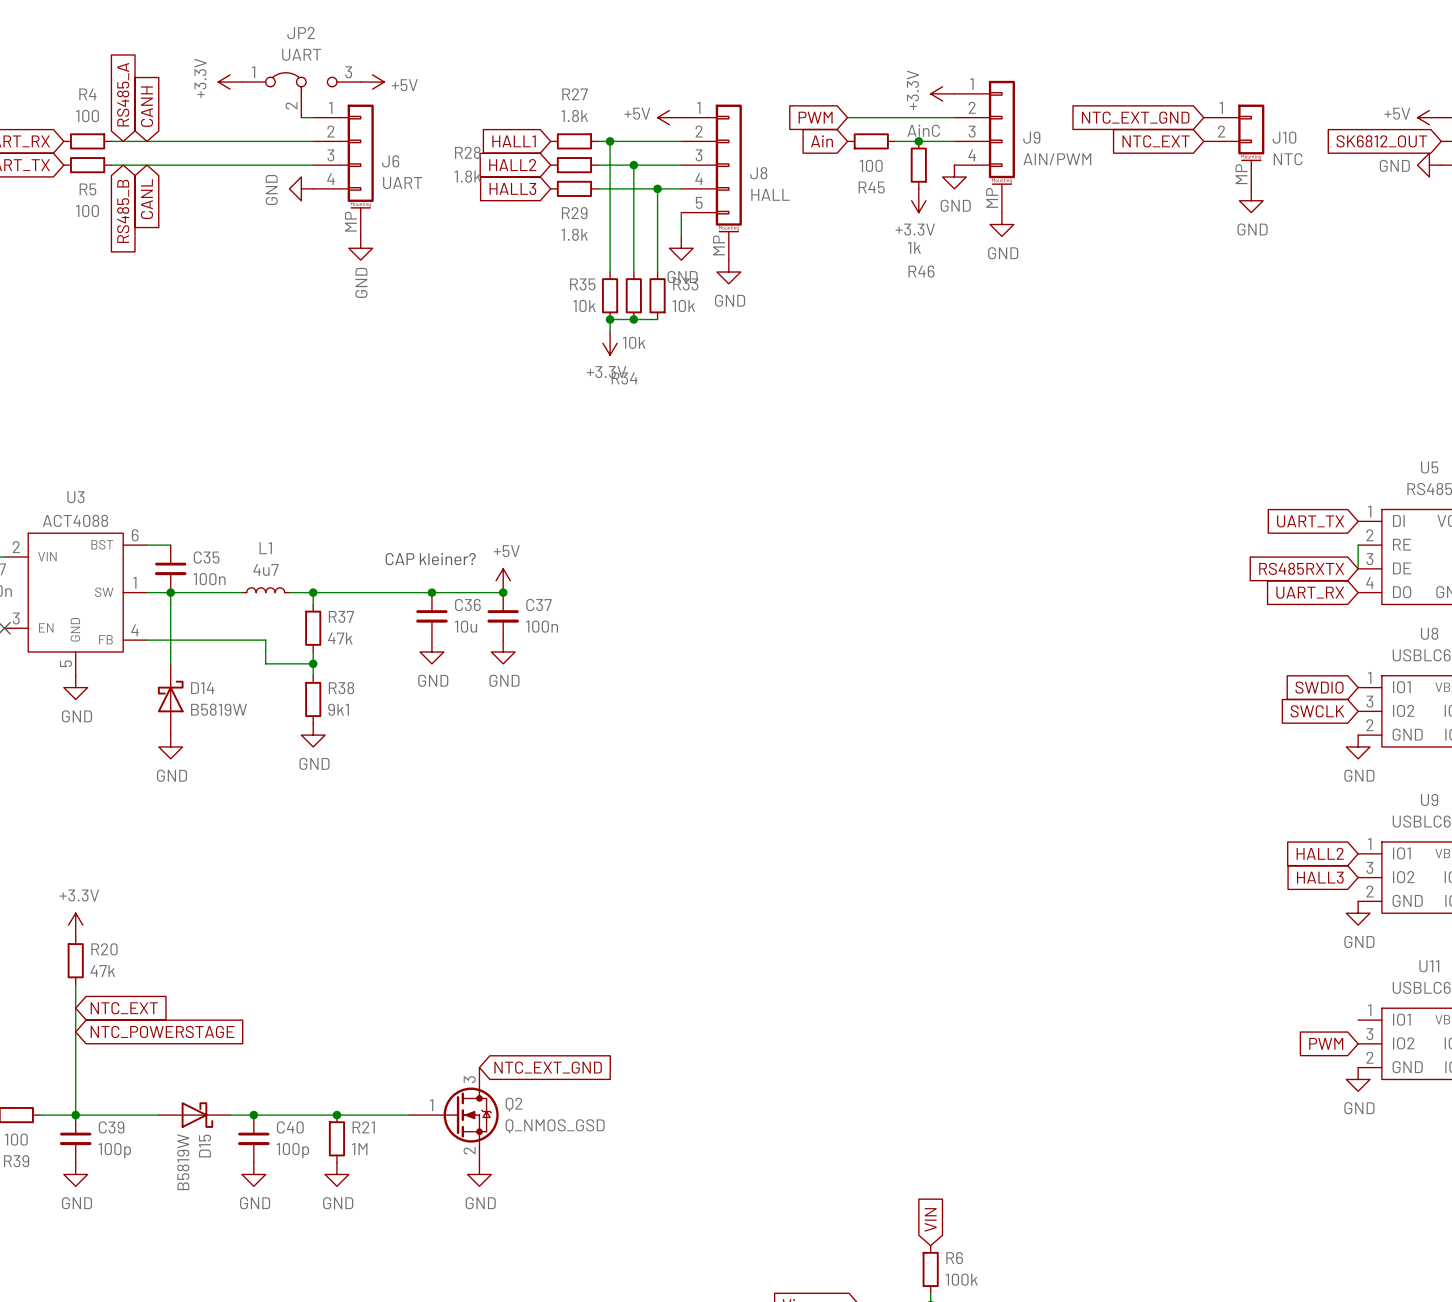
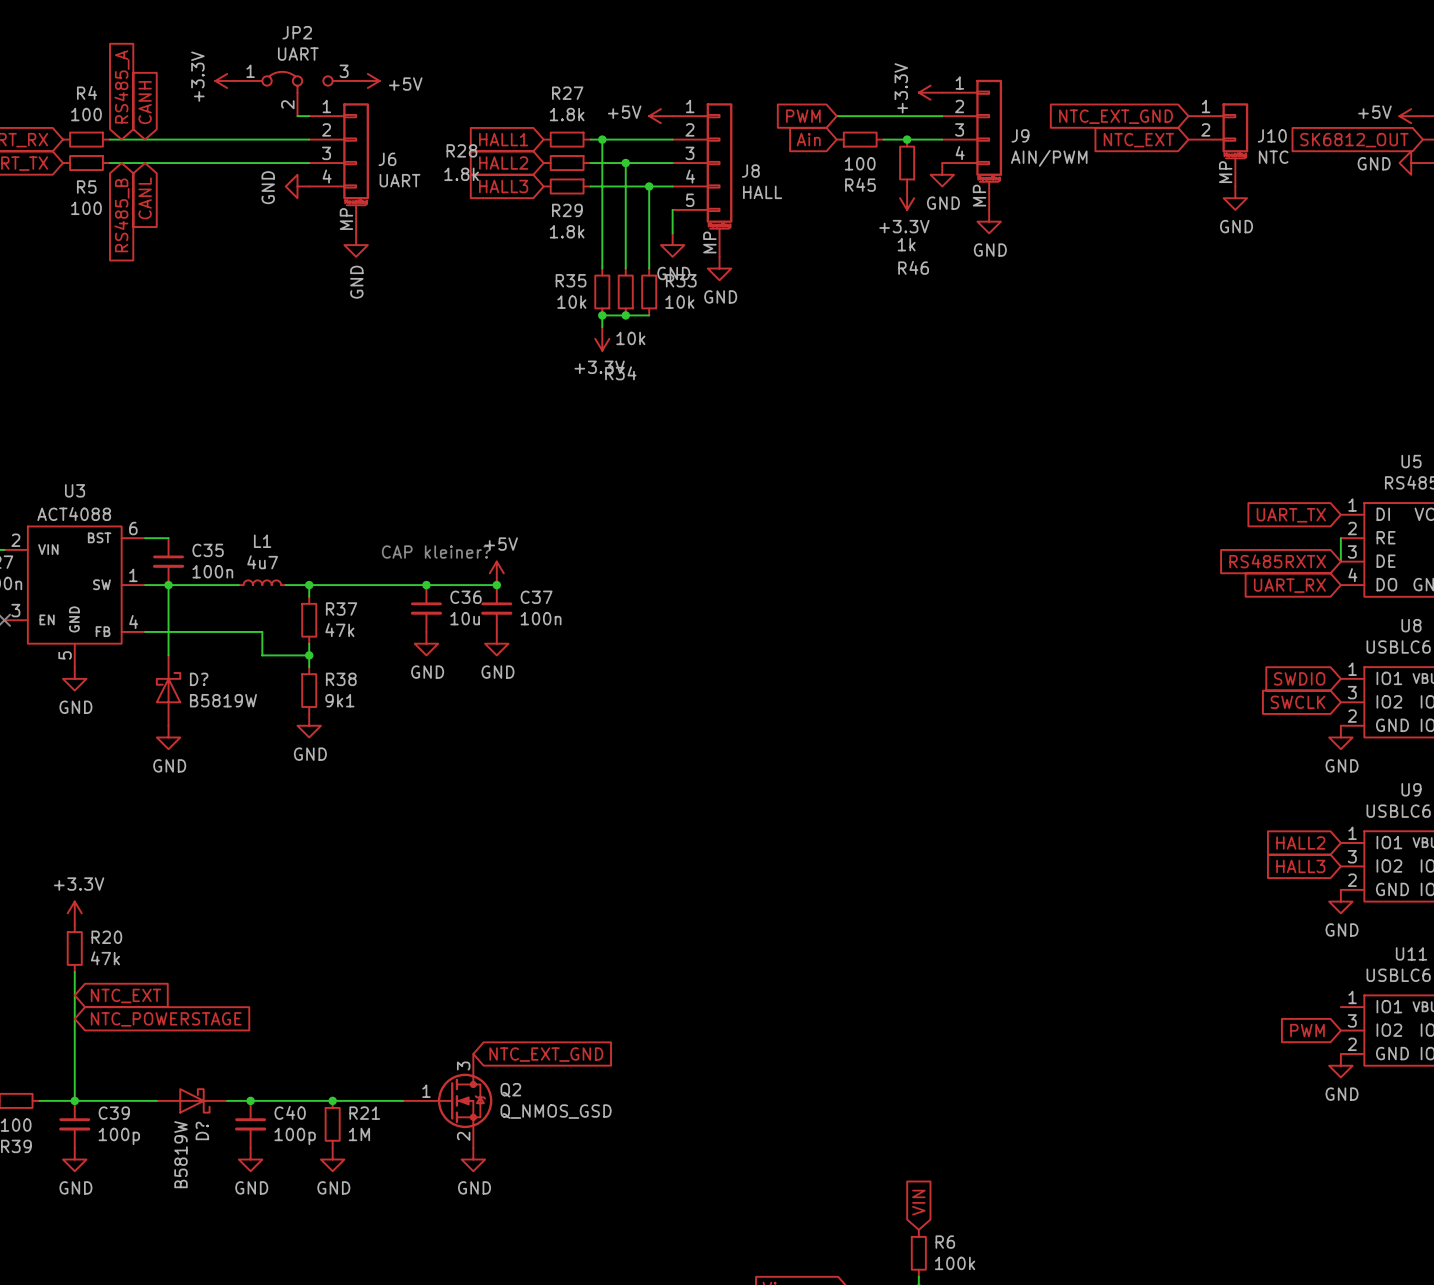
label: AinC (923, 130) -> none
D14 name: D14 (202, 688) -> D? (199, 679)
D15 name: D15 (205, 1146) -> D? (202, 1130)

